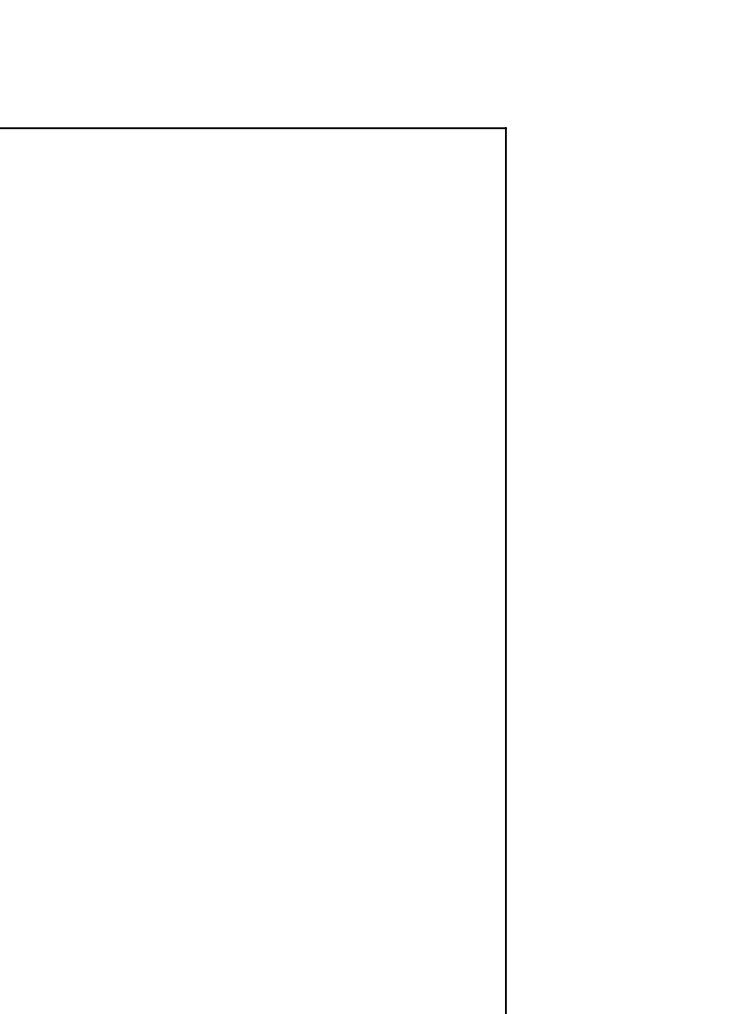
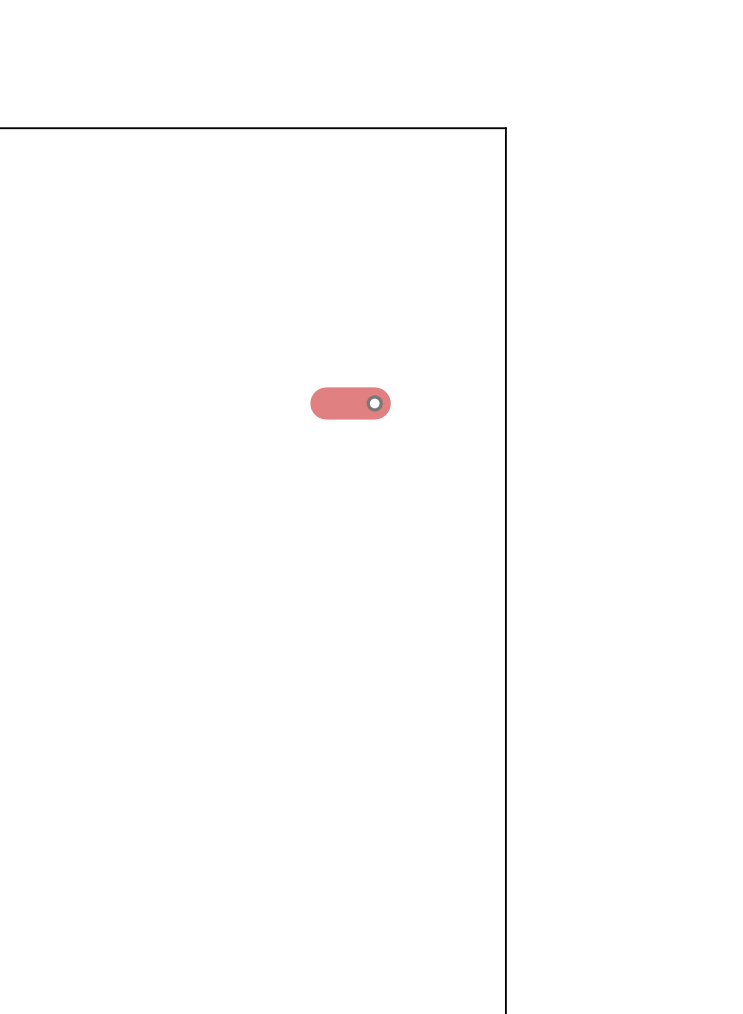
top track: none -> (326, 403) (374, 403)
via: none -> (374, 403)

